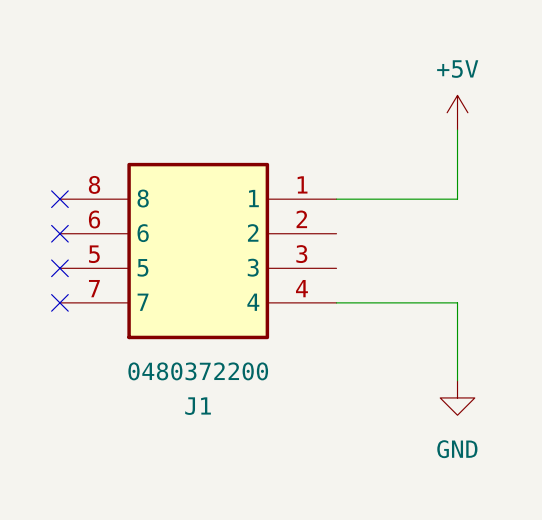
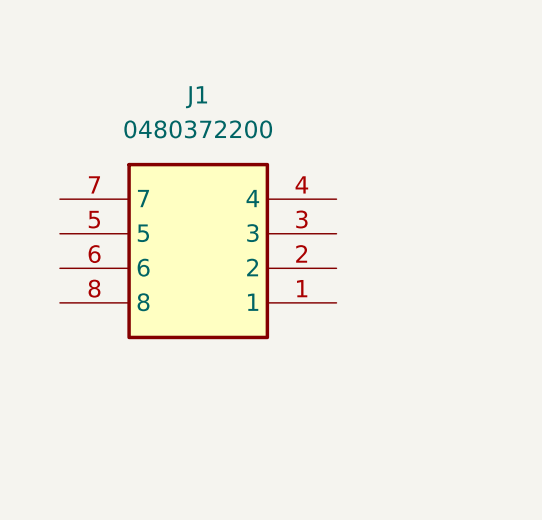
power symbol: +5V (457, 112) -> none
wire: (457, 130) (457, 199) (336, 199) -> none
no-connect mark: (59, 199) -> none
no-connect mark: (59, 233) -> none
J1 flip: as is (198, 251) -> up-down (198, 251)
no-connect mark: (59, 268) -> none
no-connect mark: (59, 302) -> none
wire: (336, 302) (457, 302) (457, 380) -> none
power symbol: GND (457, 397) -> none

